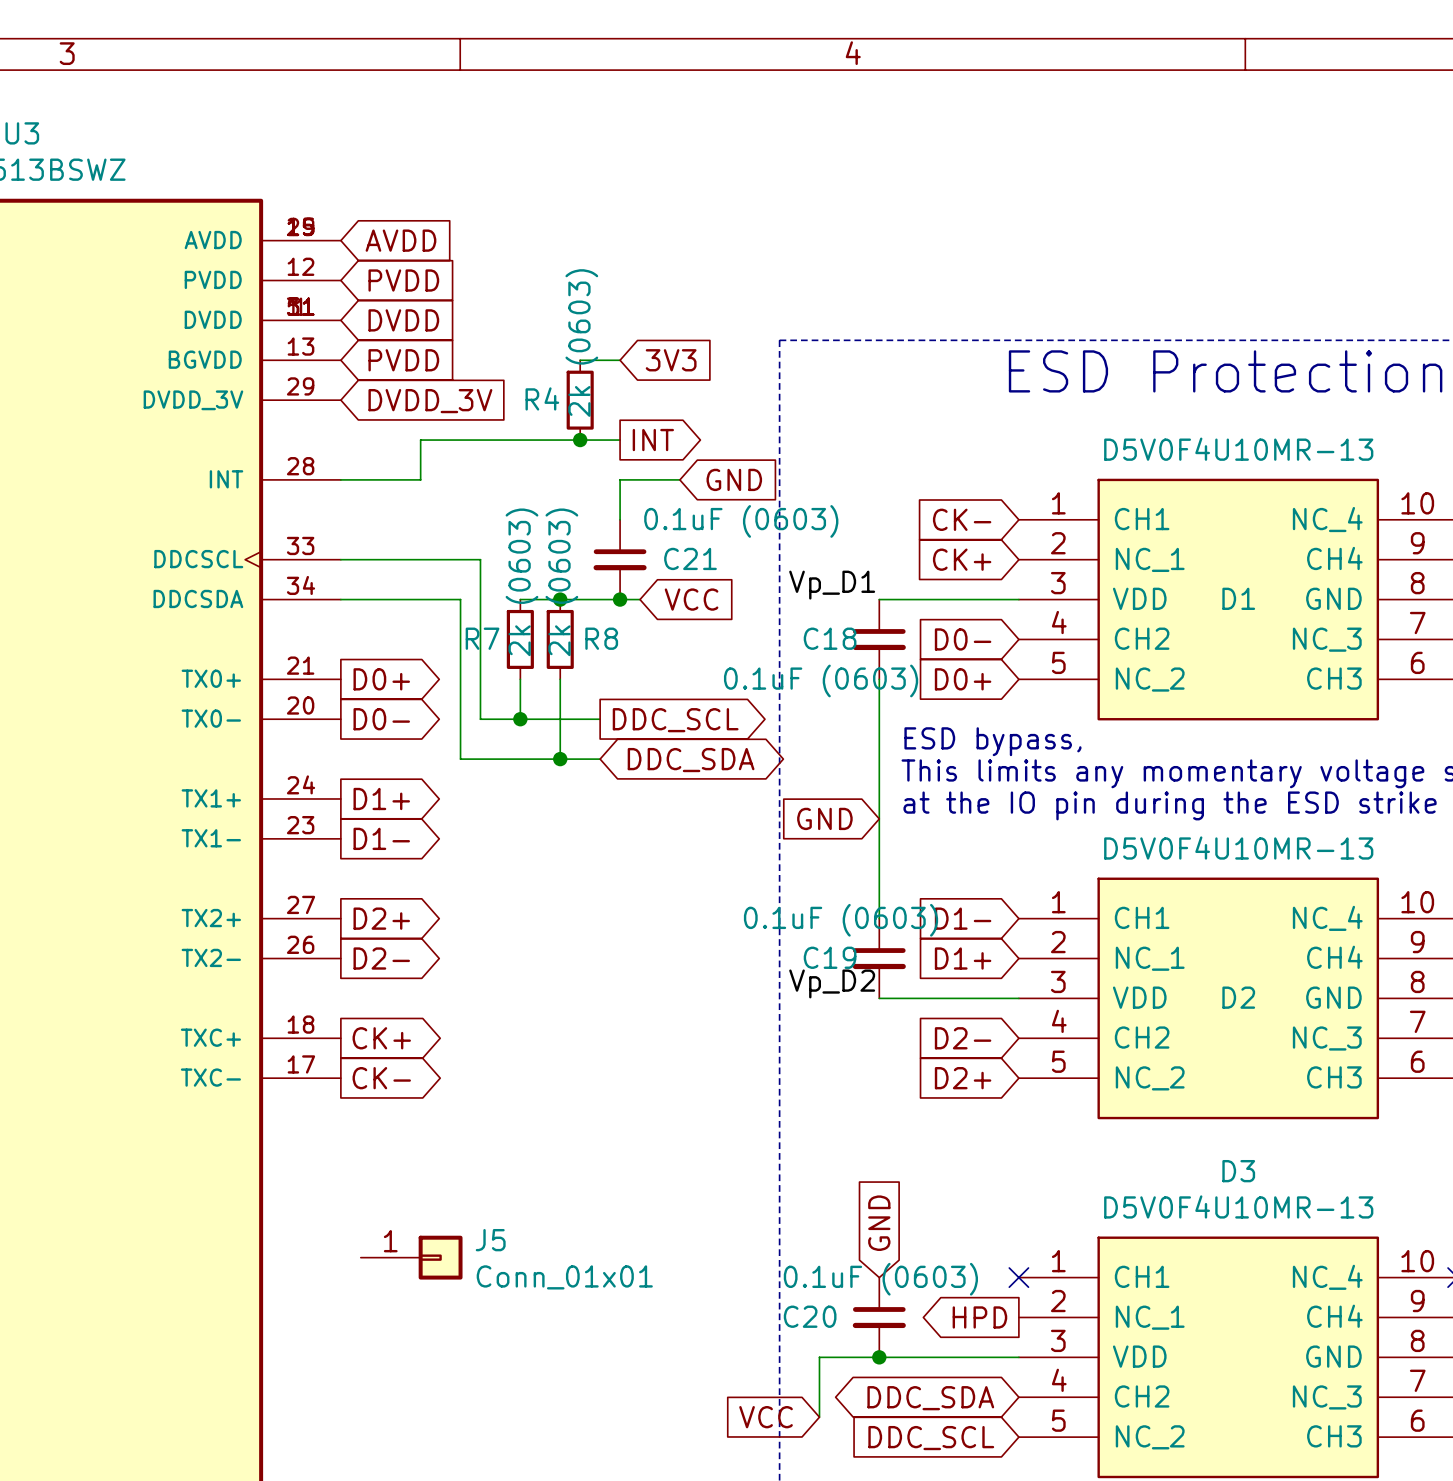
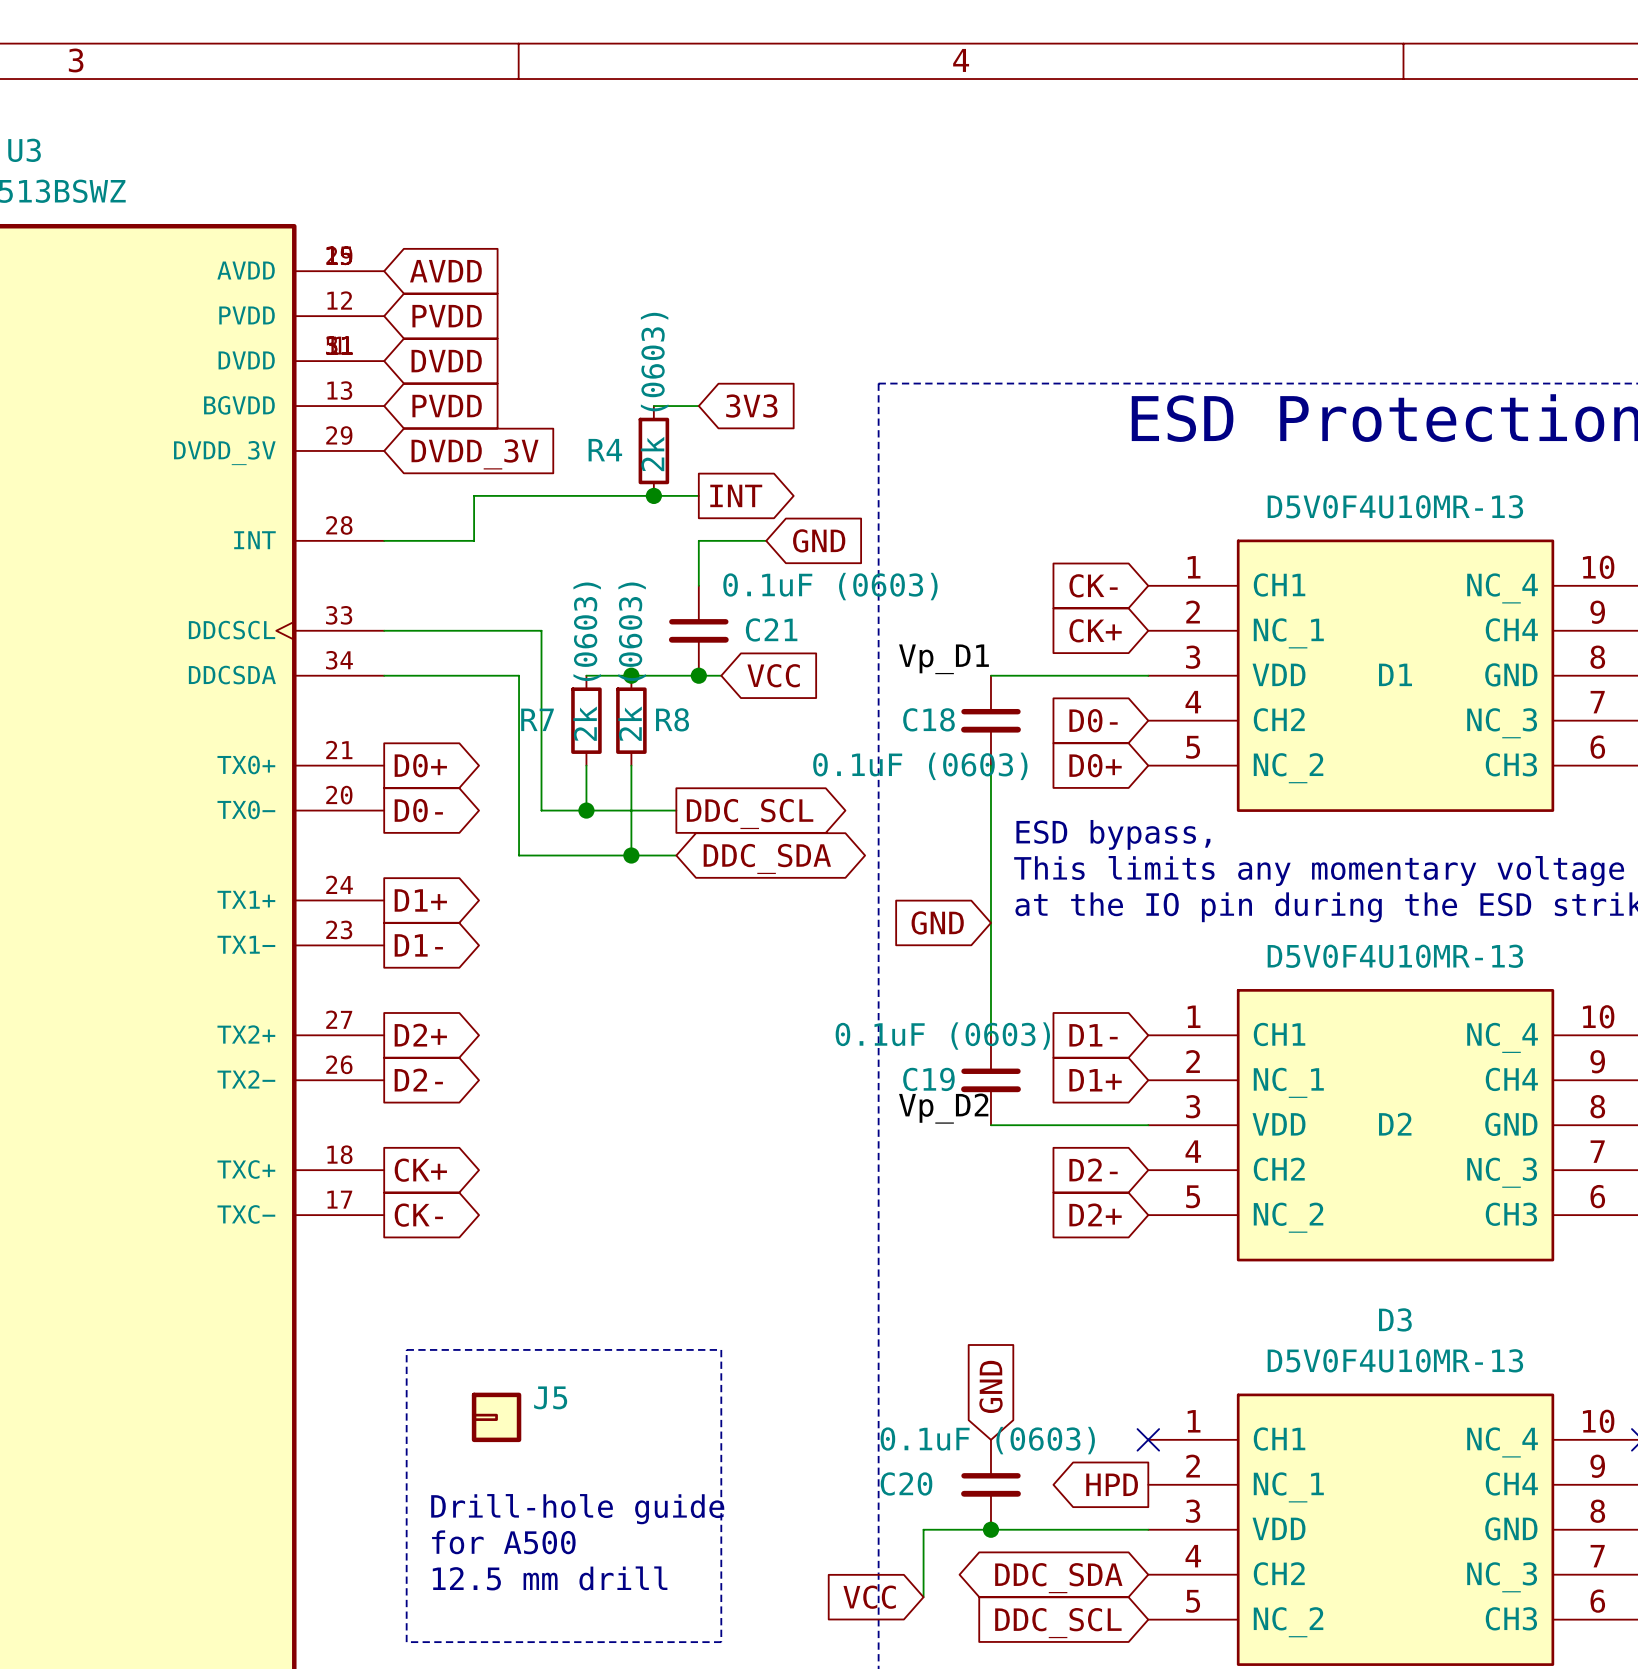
line: none -> (406, 1349) (721, 1349) (721, 1642) (406, 1642) (406, 1349)
J5 symbol: [360, 1235, 463, 1280] -> [471, 1392, 522, 1443]
J5 value: Conn_01x01 (564, 1277) -> none
text: none -> Drill-hole guide (577, 1509)
text: none -> for A500 (503, 1542)
text: none -> 12.5 mm drill (550, 1578)

